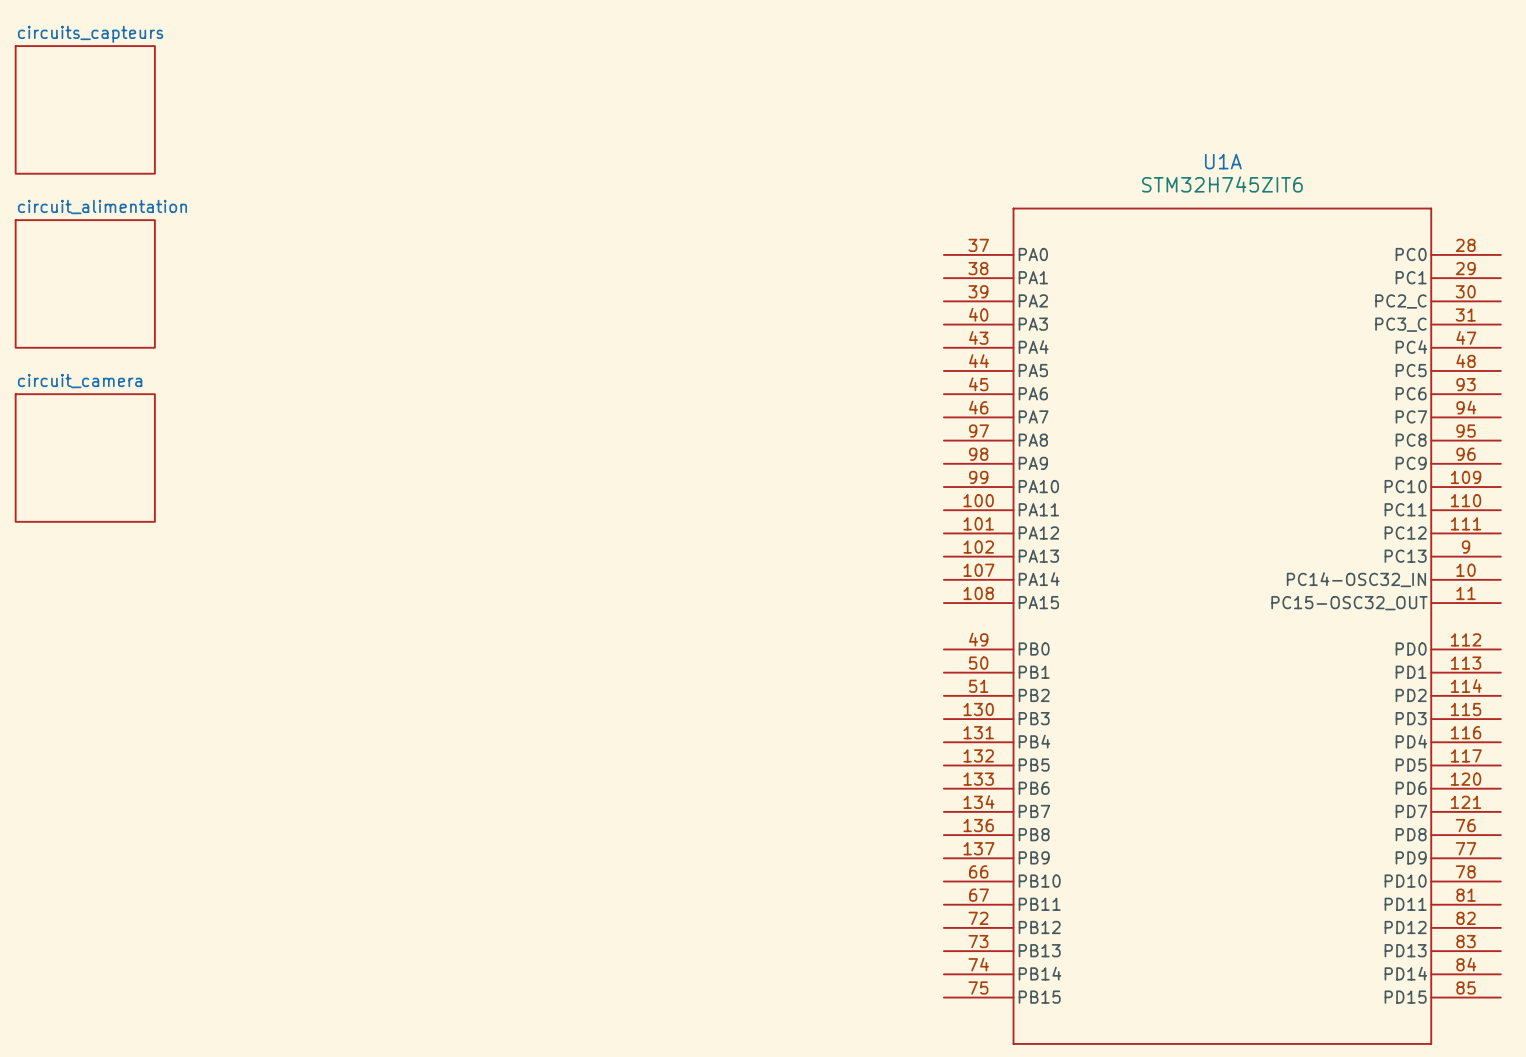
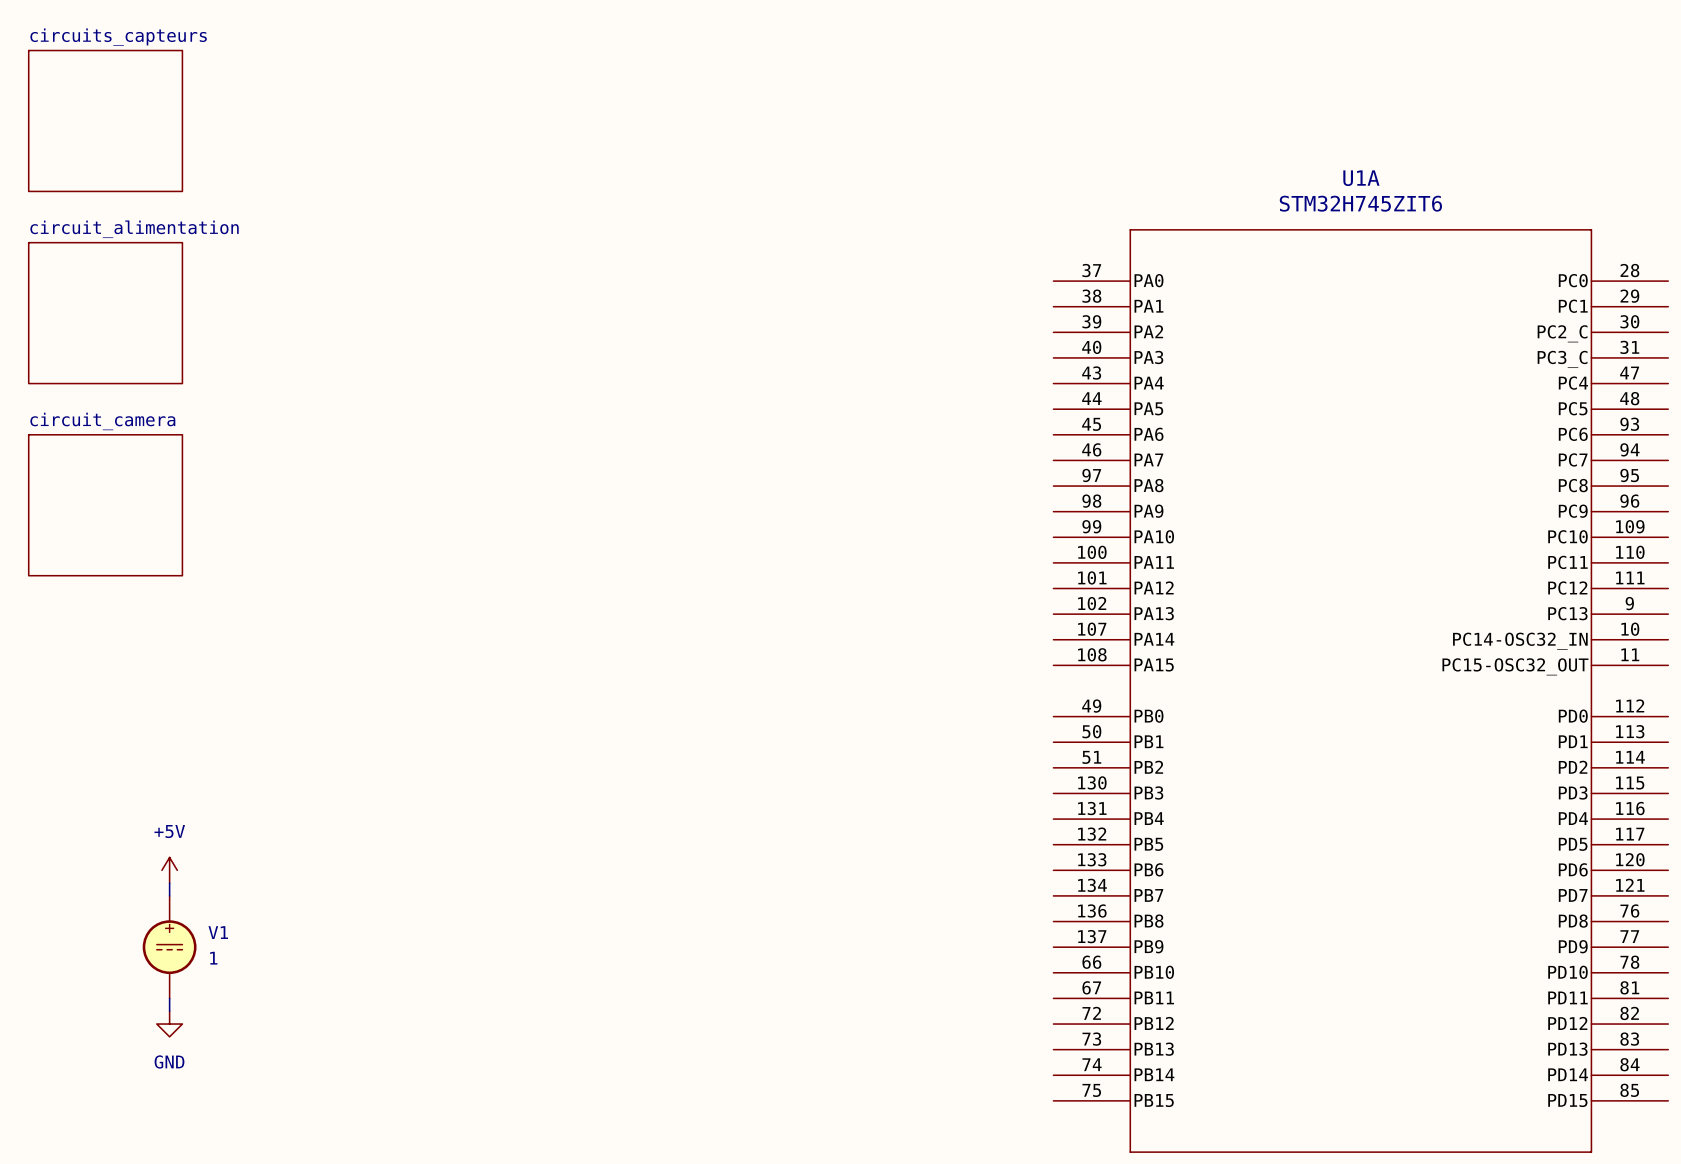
power symbol: none -> +5V (169, 870)
wire: none -> (169, 883) (169, 895)
V1: none -> 1 (169, 947)
wire: none -> (169, 998) (169, 1011)
power symbol: none -> GND (169, 1024)

